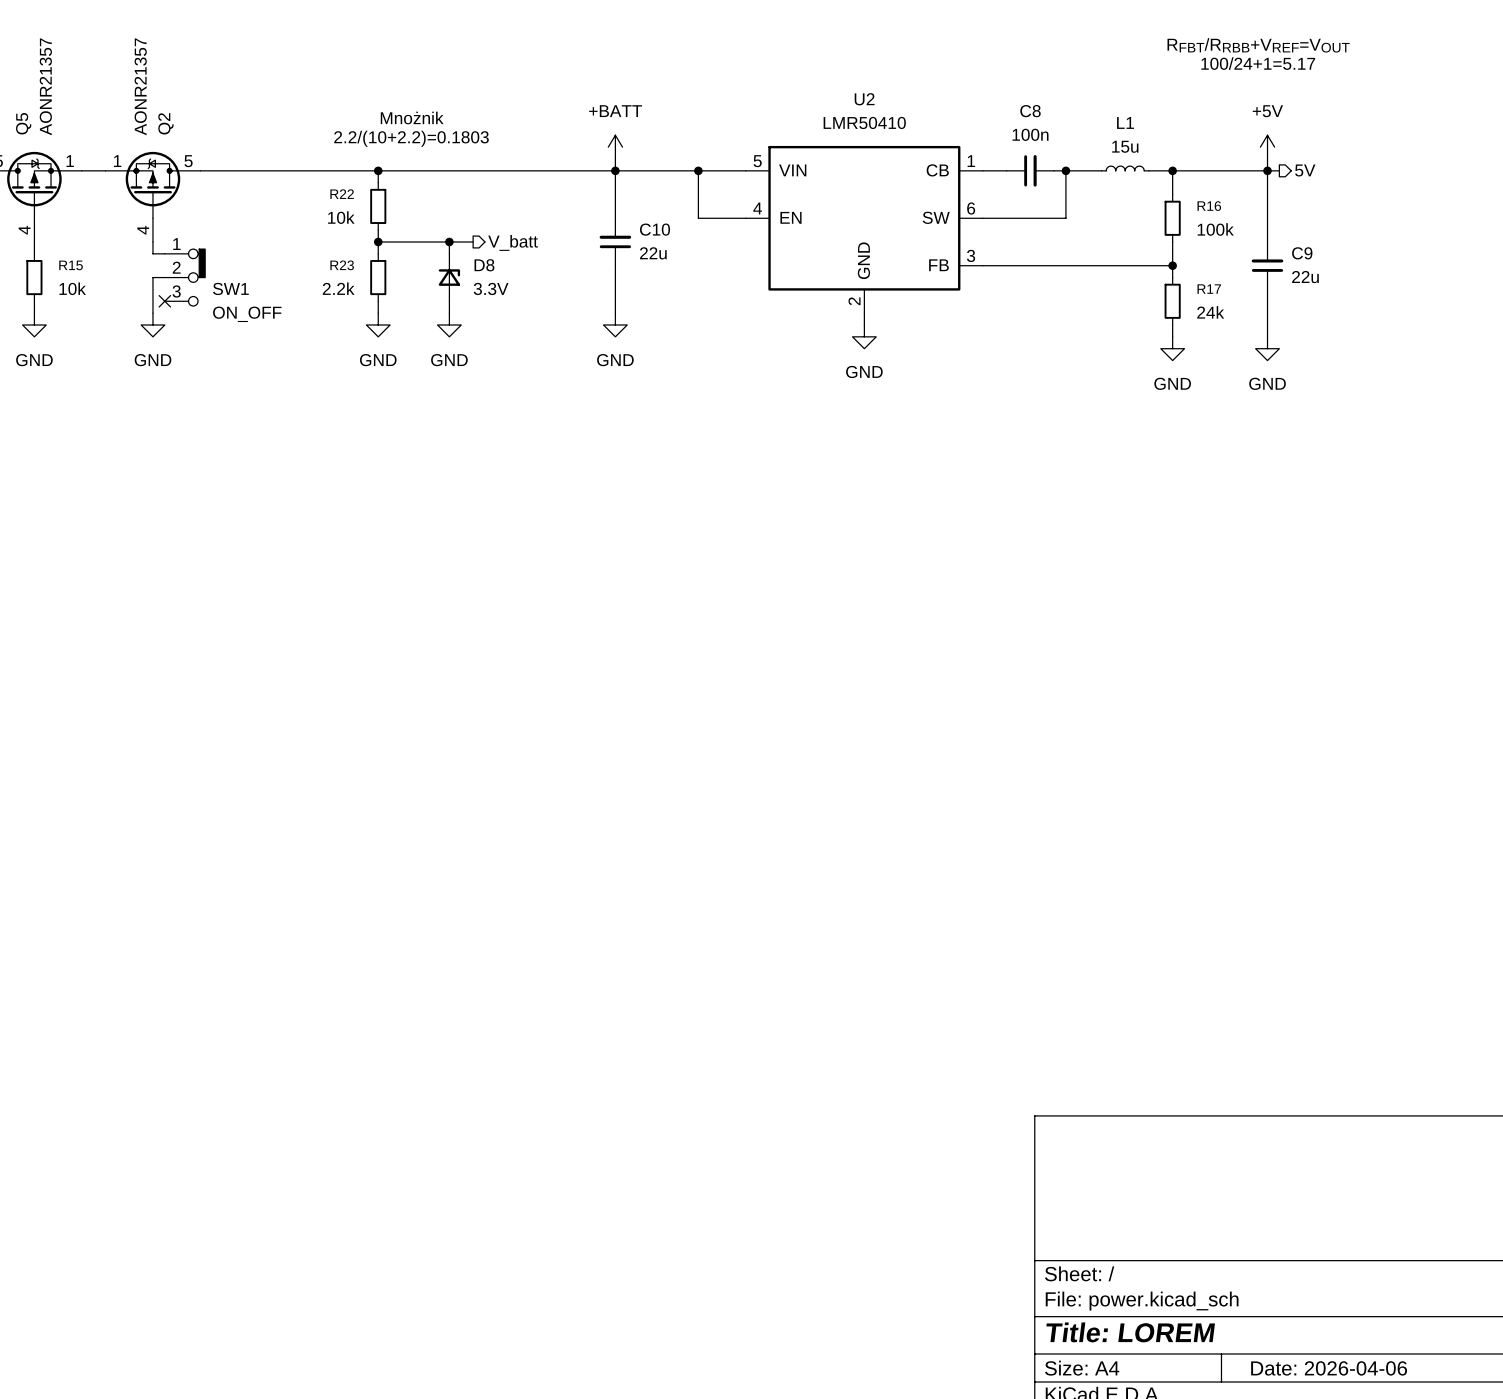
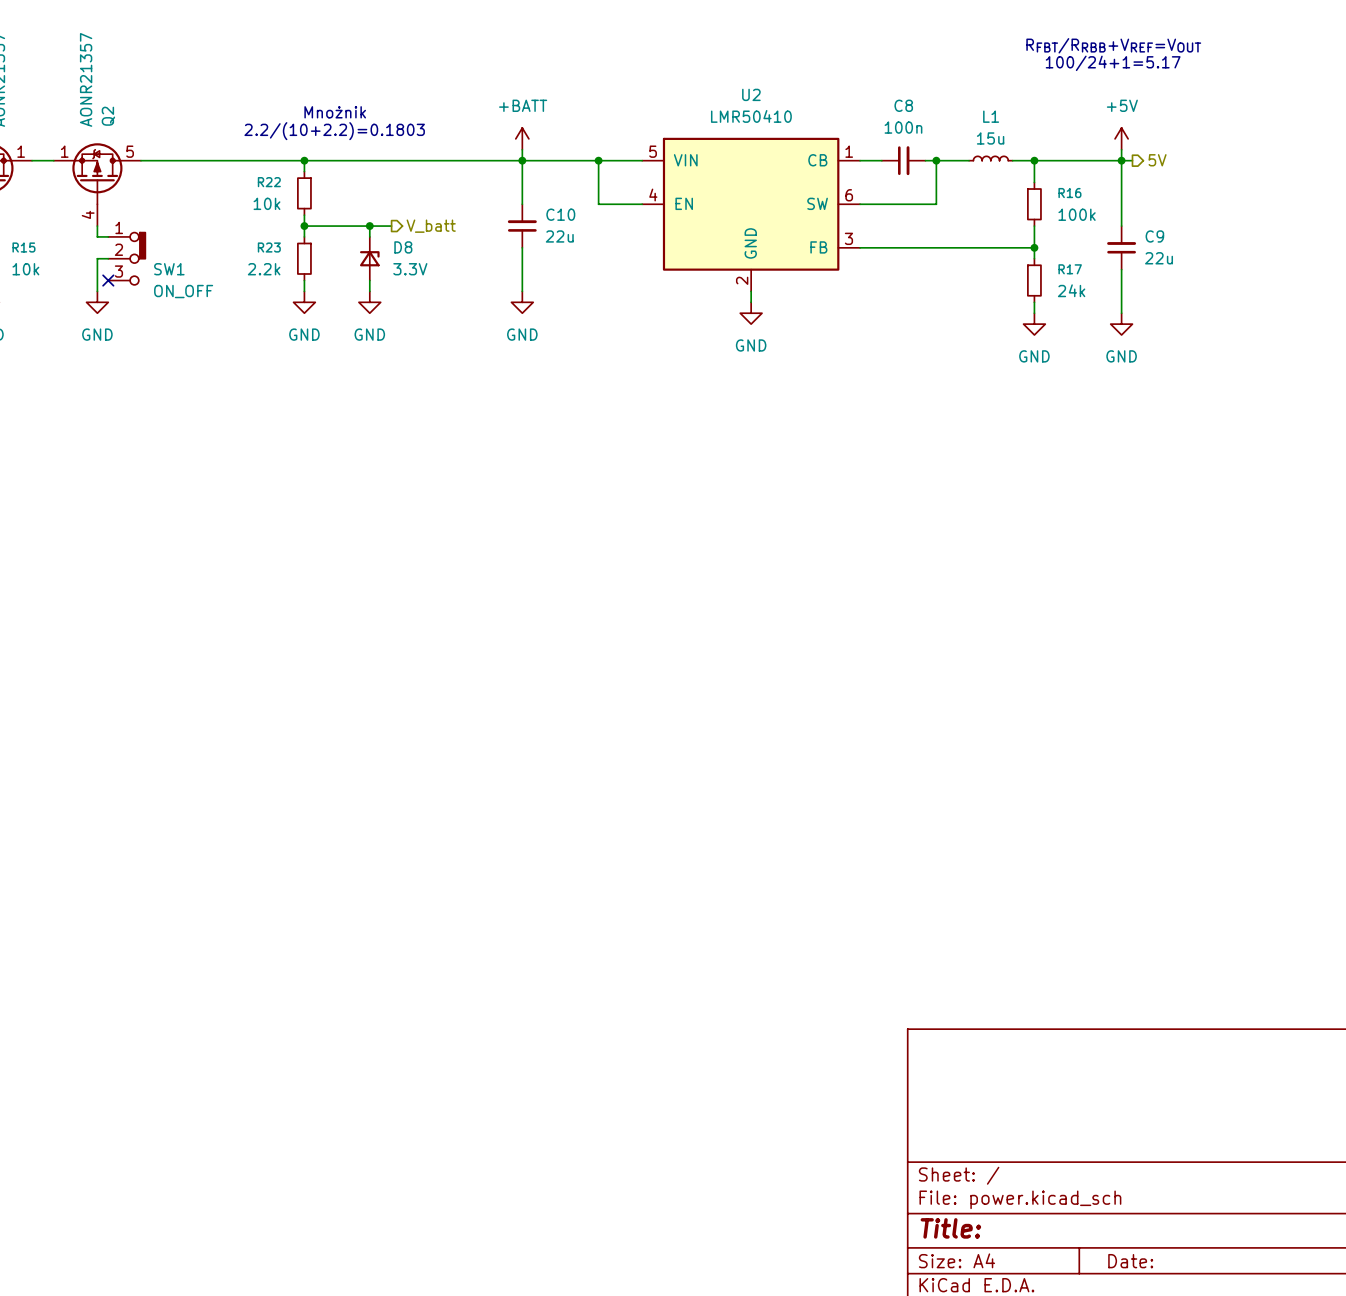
title block: Title: LOREM (1130, 1332) -> Title: (950, 1228)
title block: Date: 2026-04-06 (1329, 1368) -> Date: (1130, 1261)

